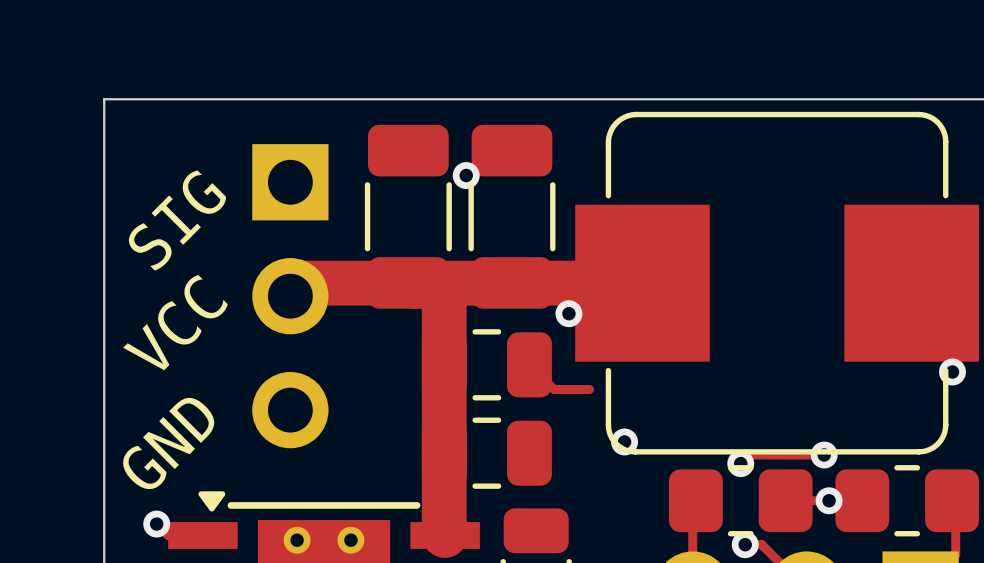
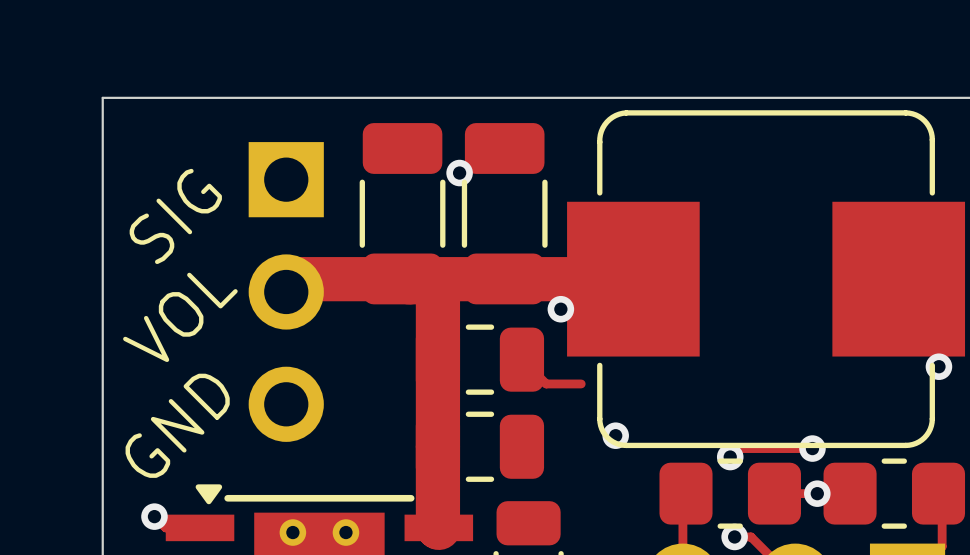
text: VCC (175, 322) -> VOL (180, 317)

